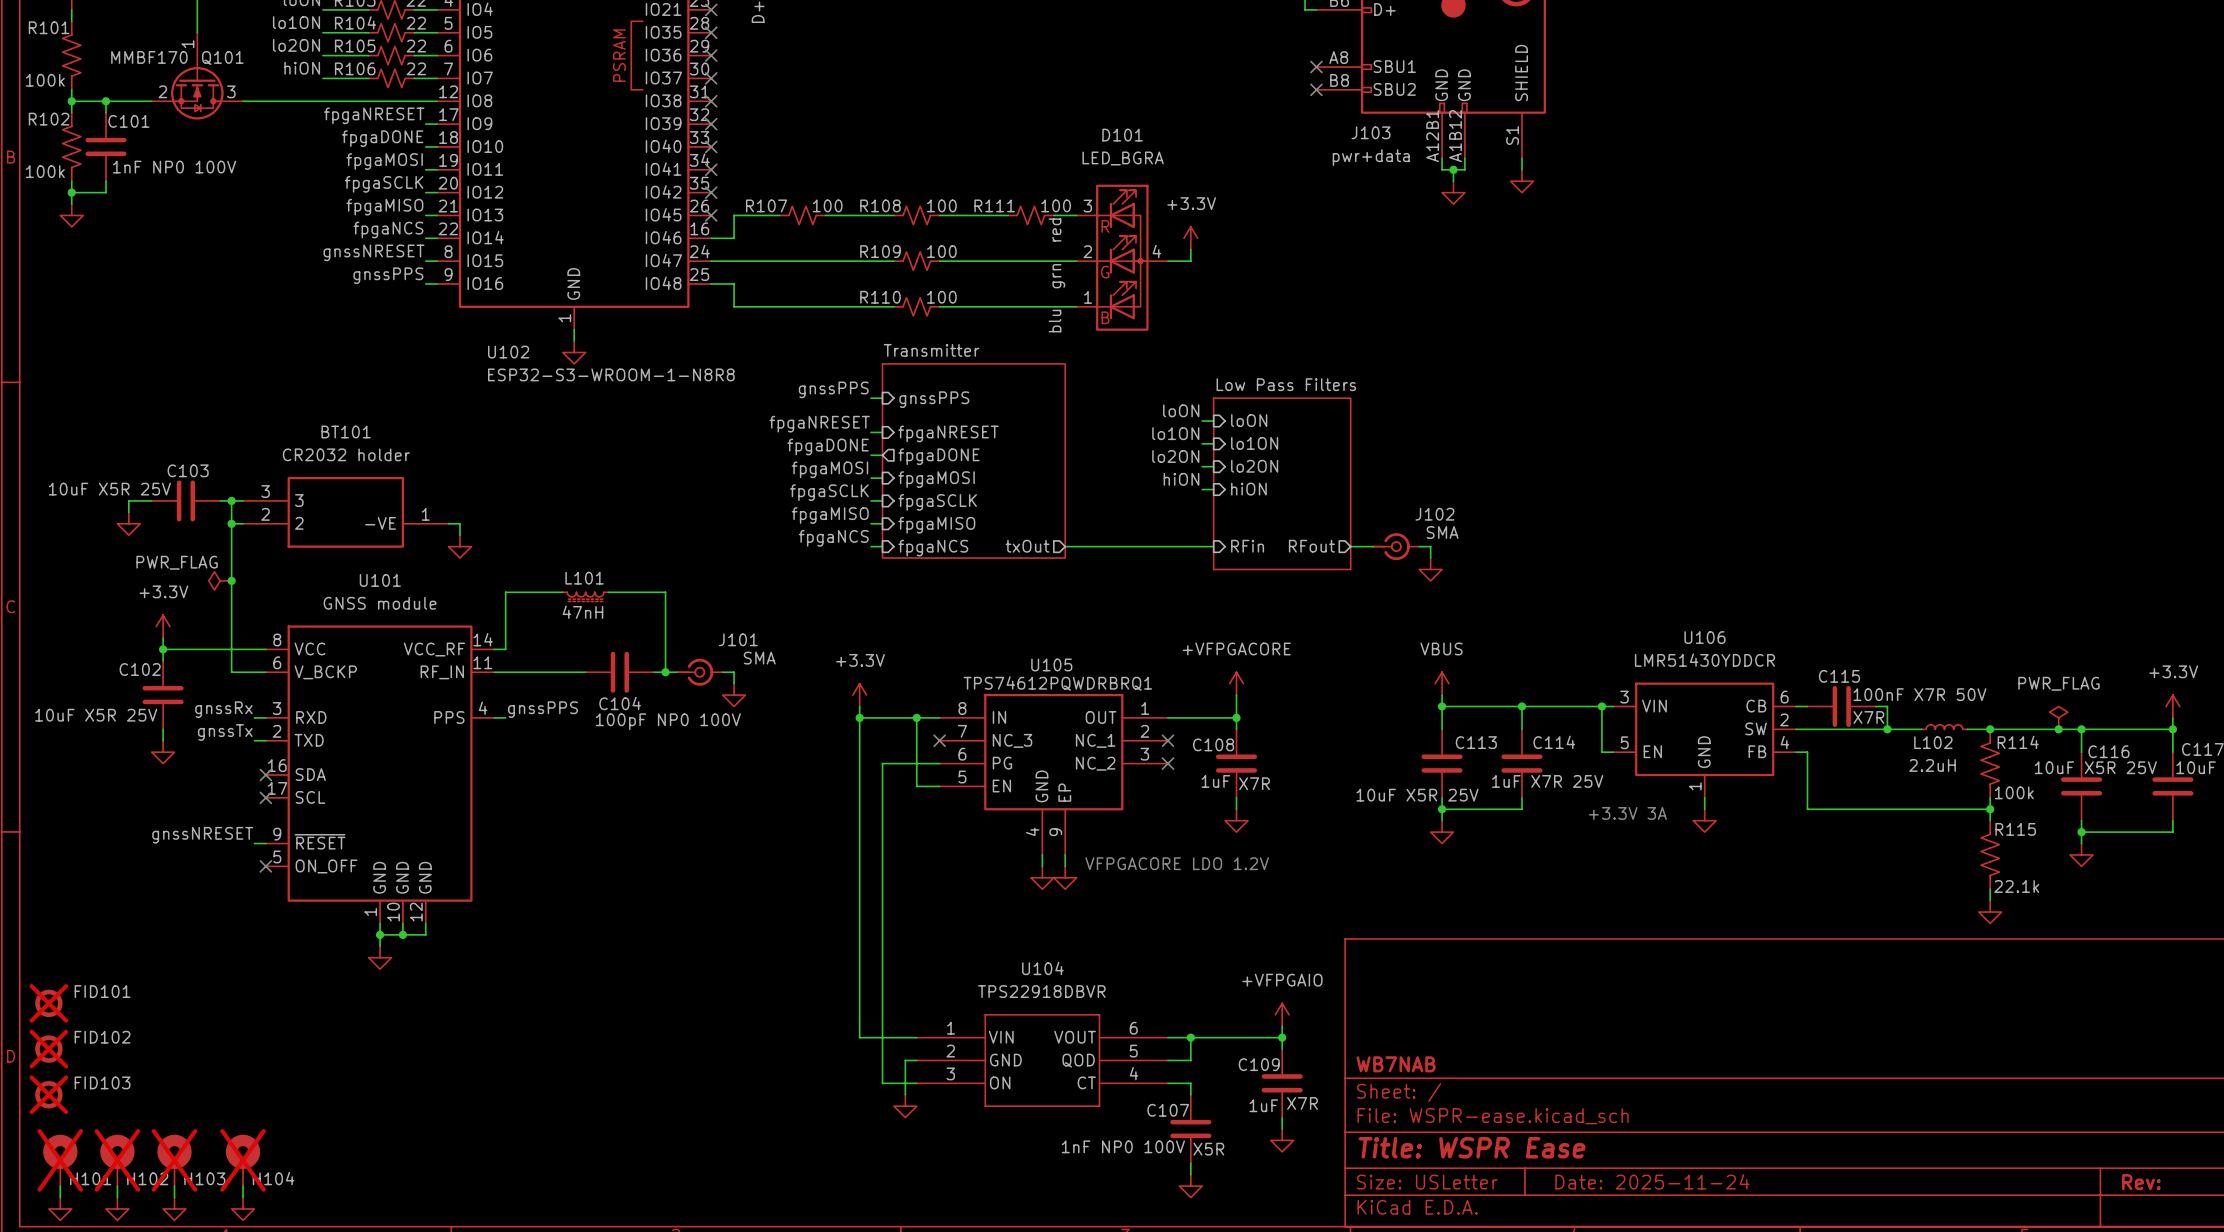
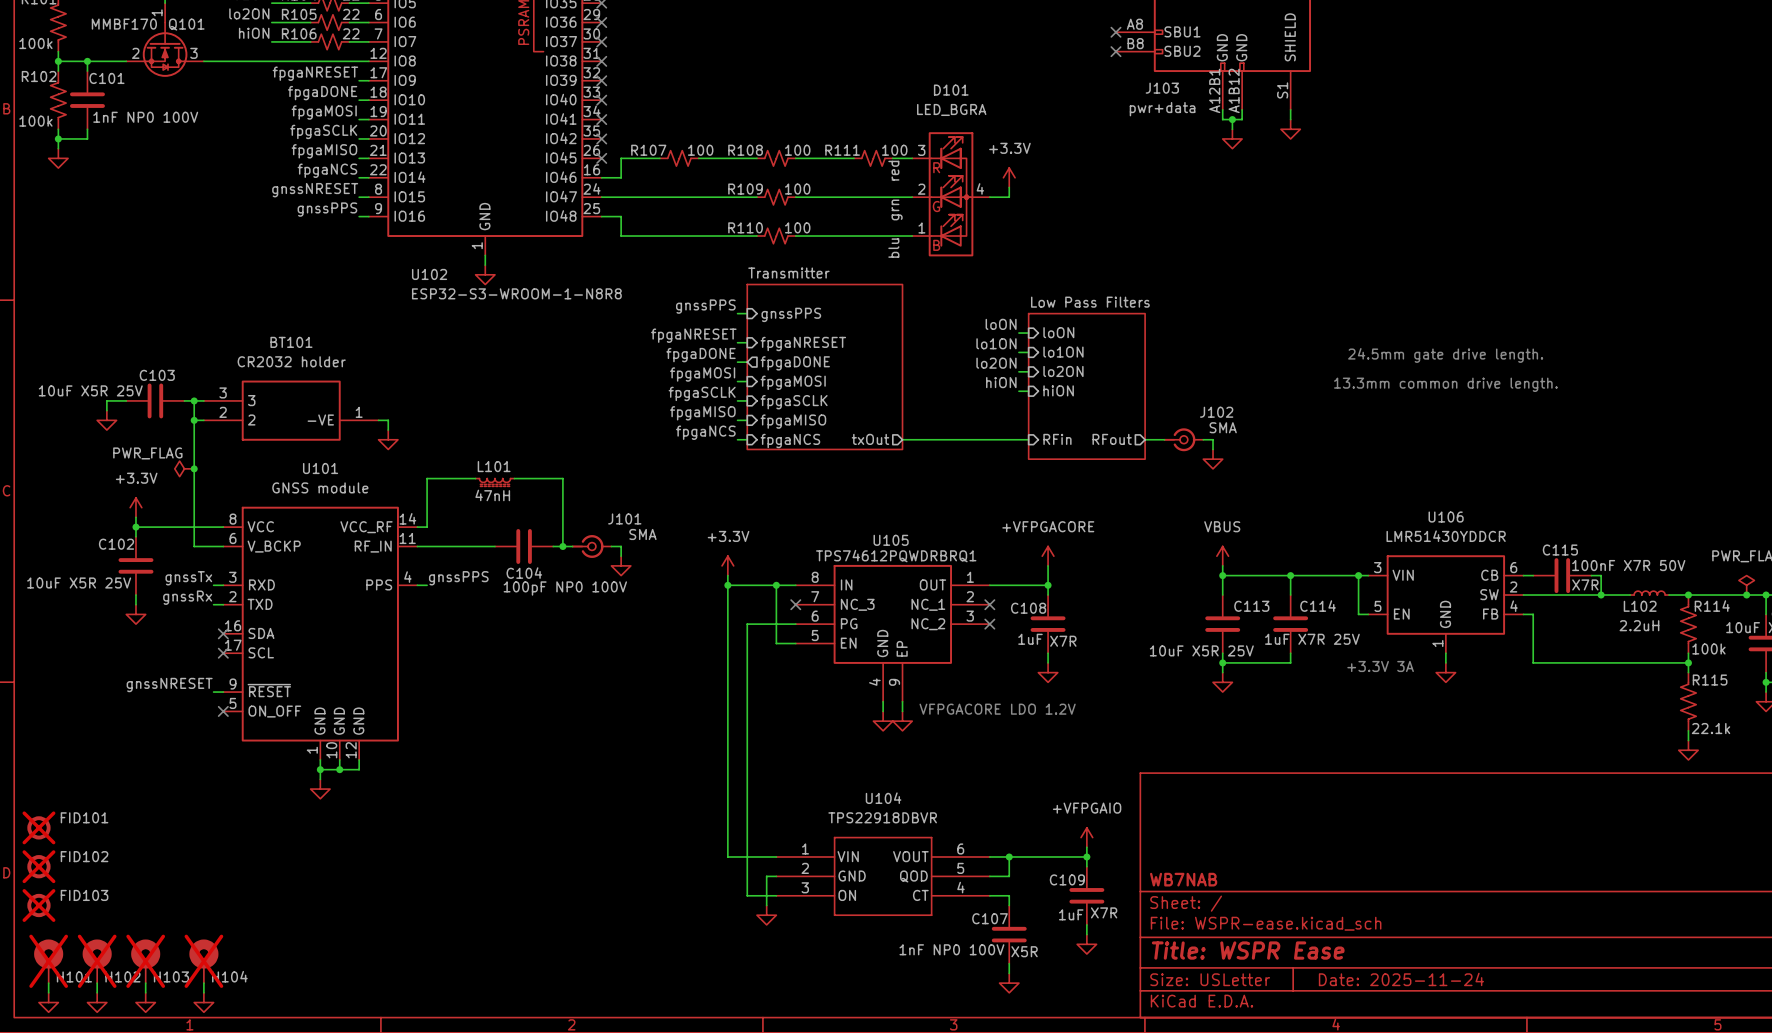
text: none -> 24.5mm gate drive length. (1445, 355)
text: none -> 13.3mm common drive length. (1445, 384)
label: gnssRx (223, 709) -> gnssTx (188, 578)
label: gnssTx (225, 732) -> gnssRx (187, 597)

